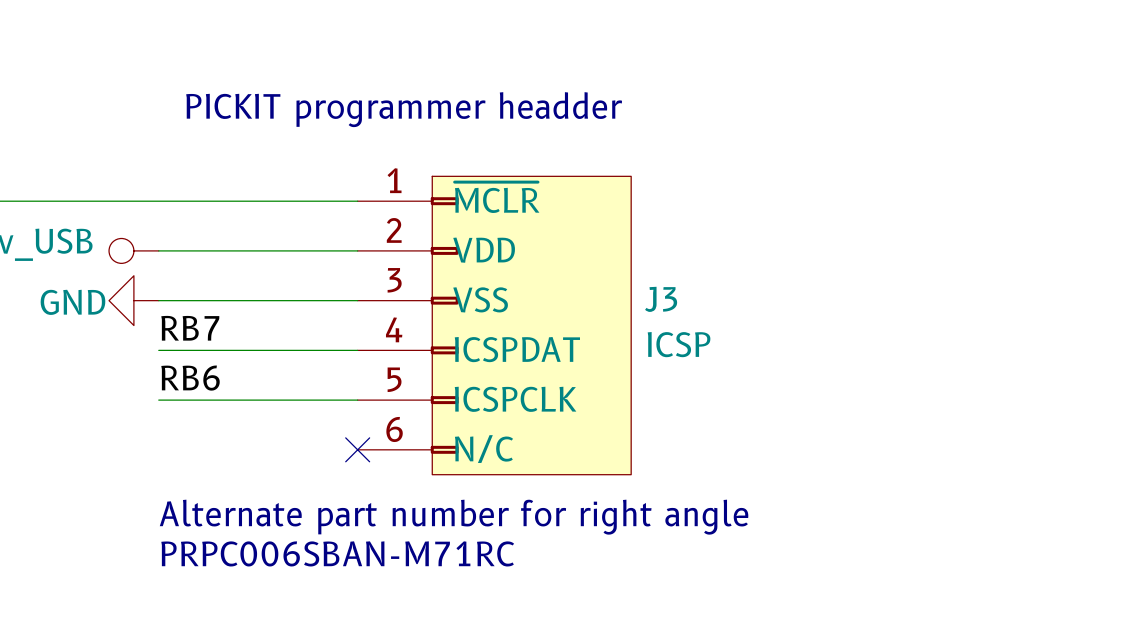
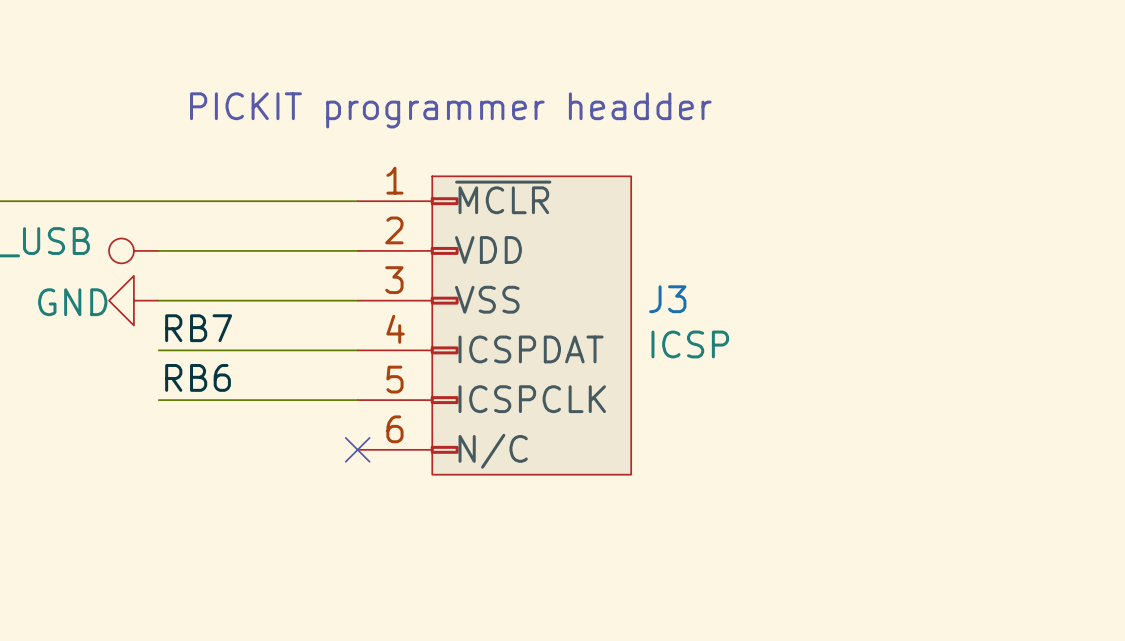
text: Alternate part number for right angle (454, 517) -> none
text: PRPC006SBAN-M71RC (337, 553) -> none

